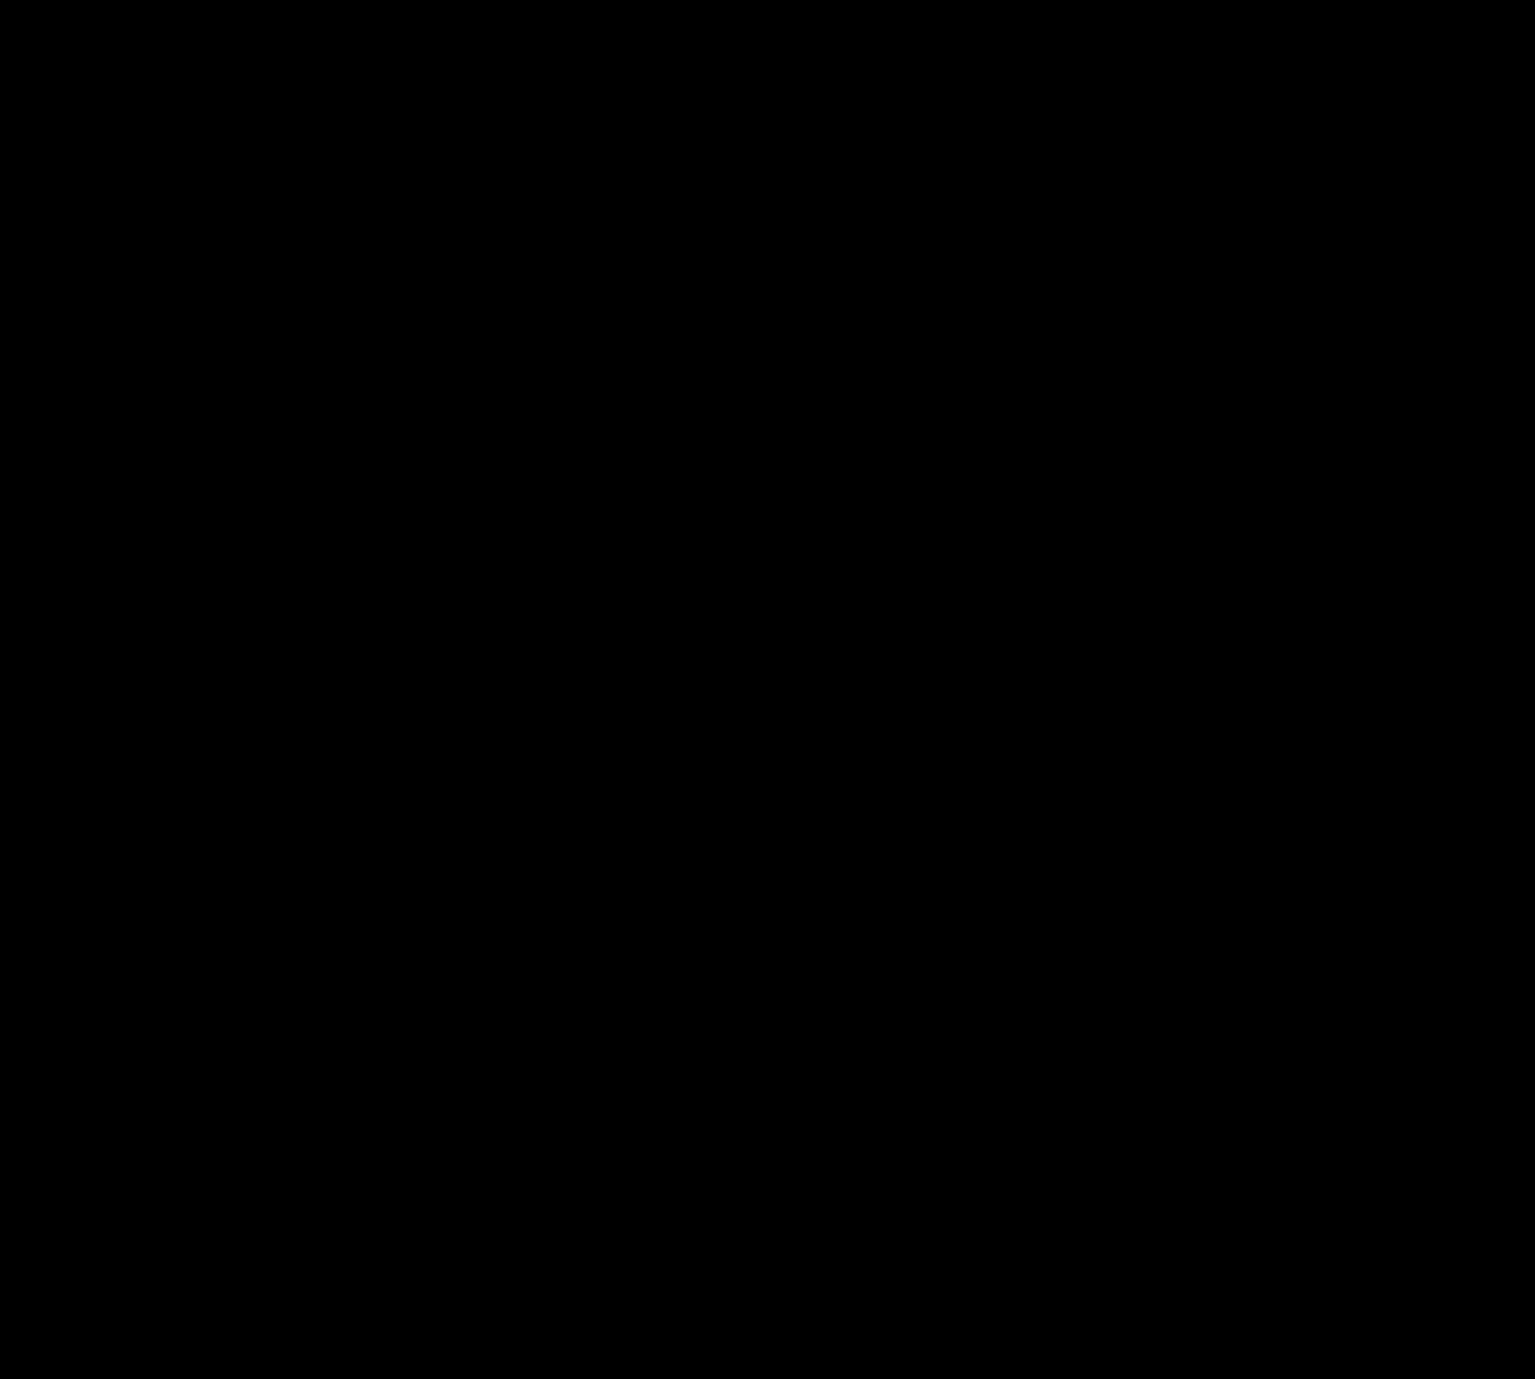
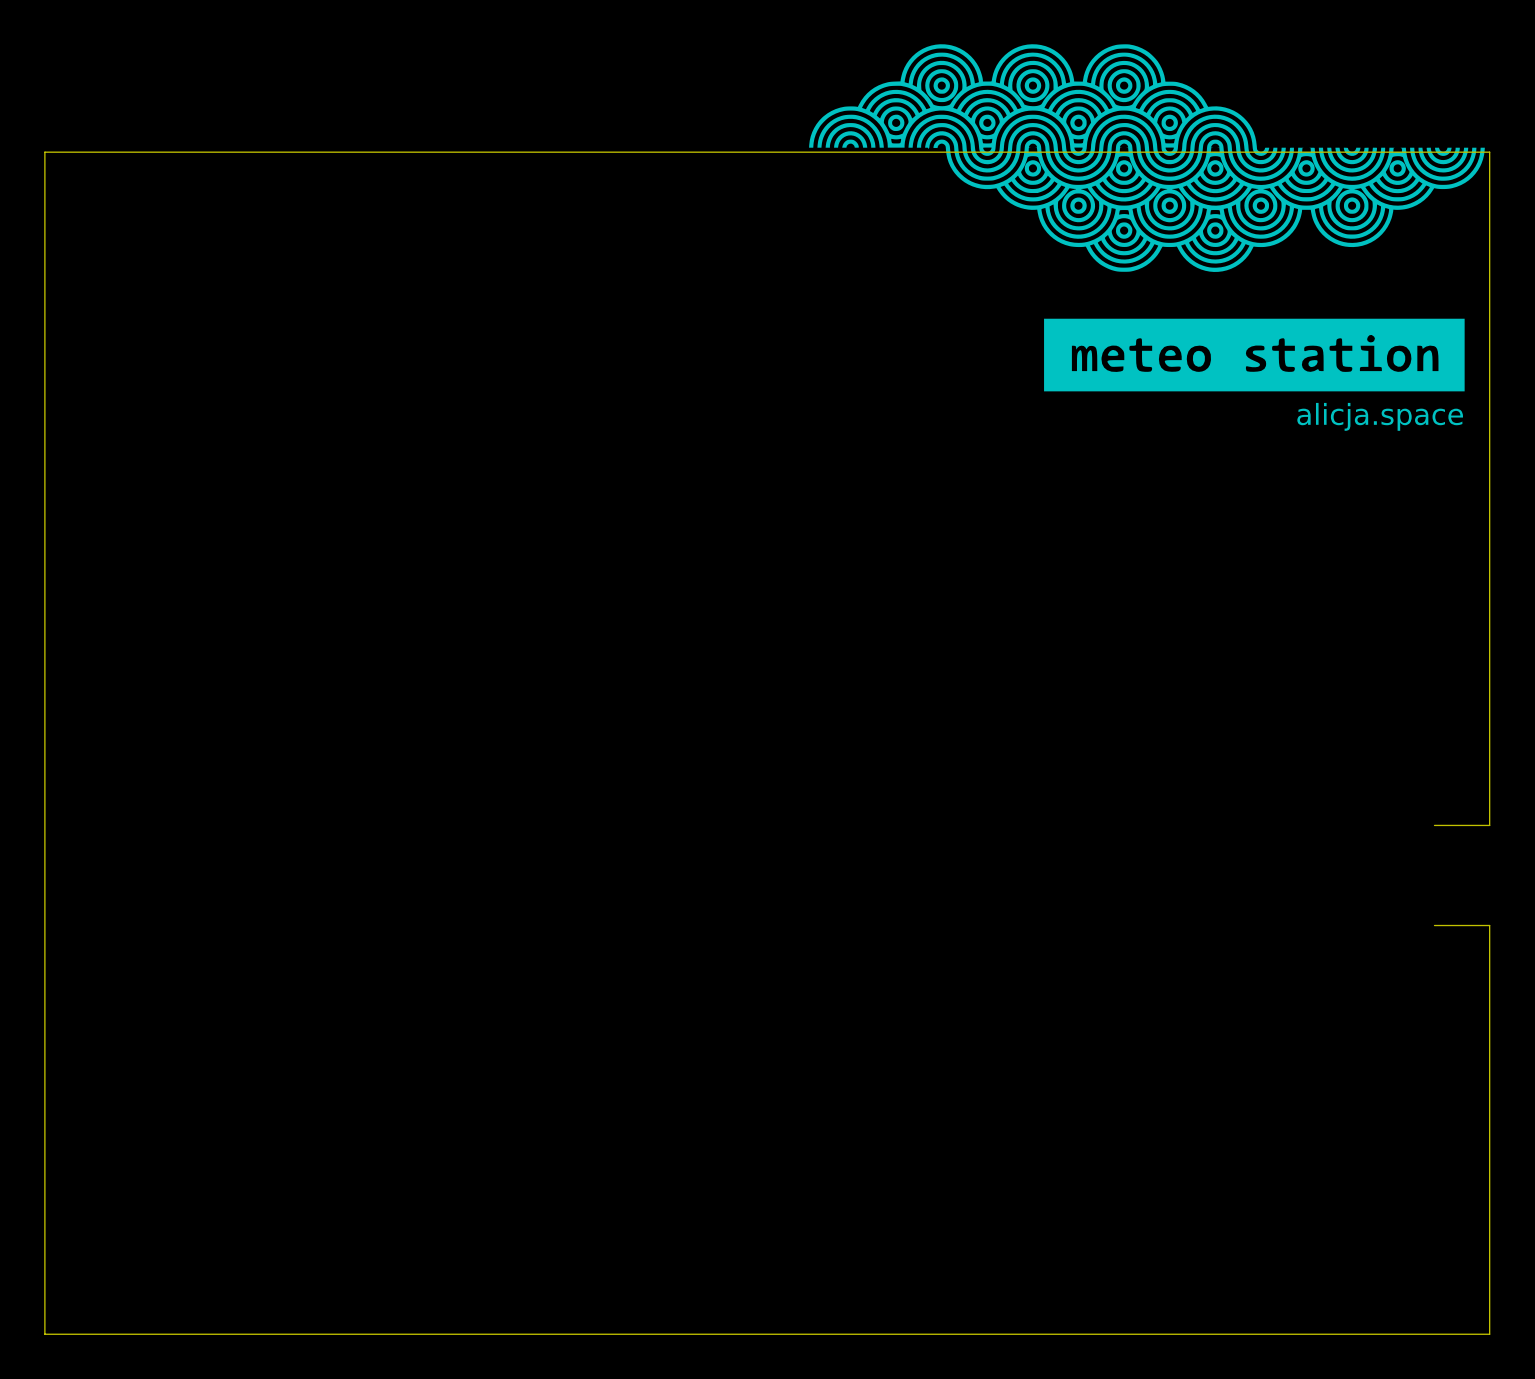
drawing: none -> [809, 44, 1485, 272]
drawing: none -> [1044, 318, 1465, 392]
text: none -> alicja.space (1380, 416)
board edge: none -> (1434, 825) (1489, 825) (1489, 152) (44, 152) (44, 1334) (1489, 1334) (1489, 925) (1434, 925)

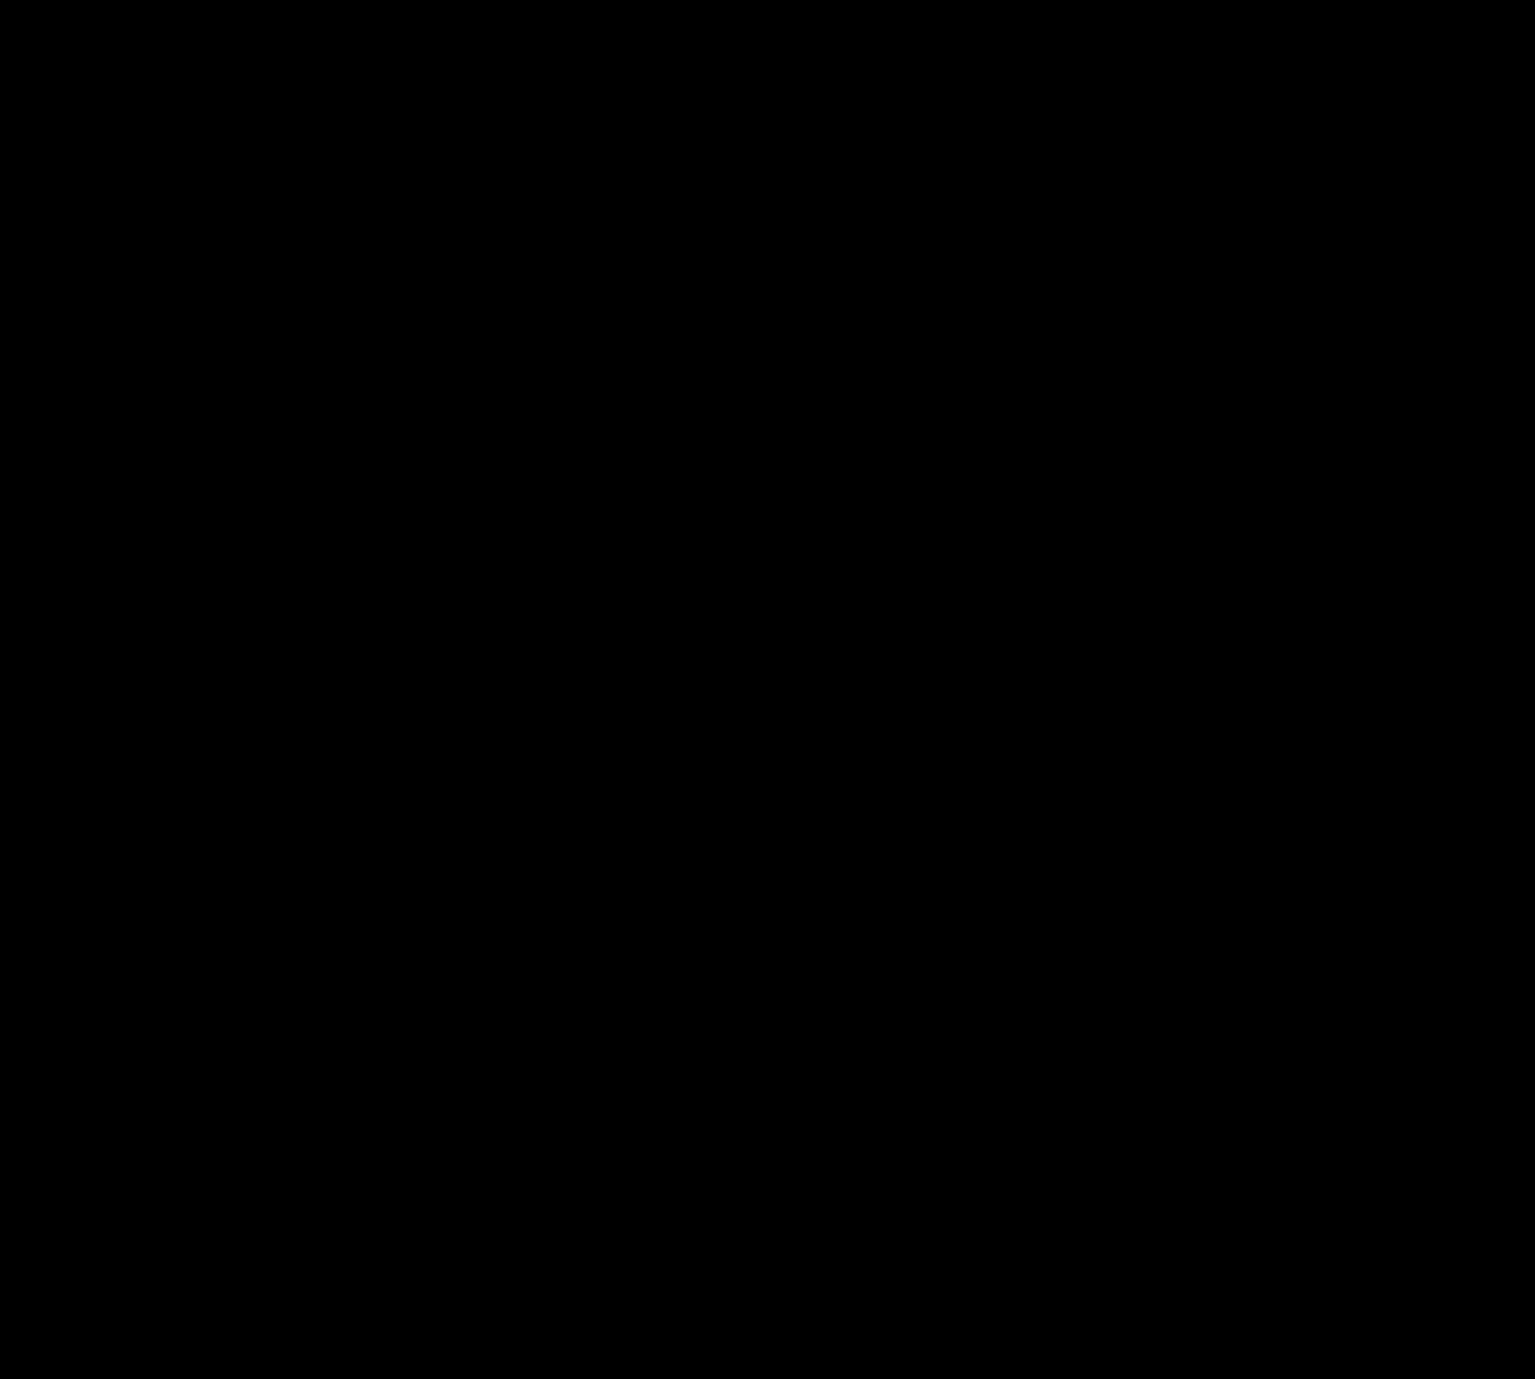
drawing: [809, 44, 1485, 272] -> none
drawing: [1044, 318, 1465, 392] -> none
text: alicja.space (1380, 416) -> none
board edge: (1434, 825) (1489, 825) (1489, 152) (44, 152) (44, 1334) (1489, 1334) (1489, 925) (1434, 925) -> none

